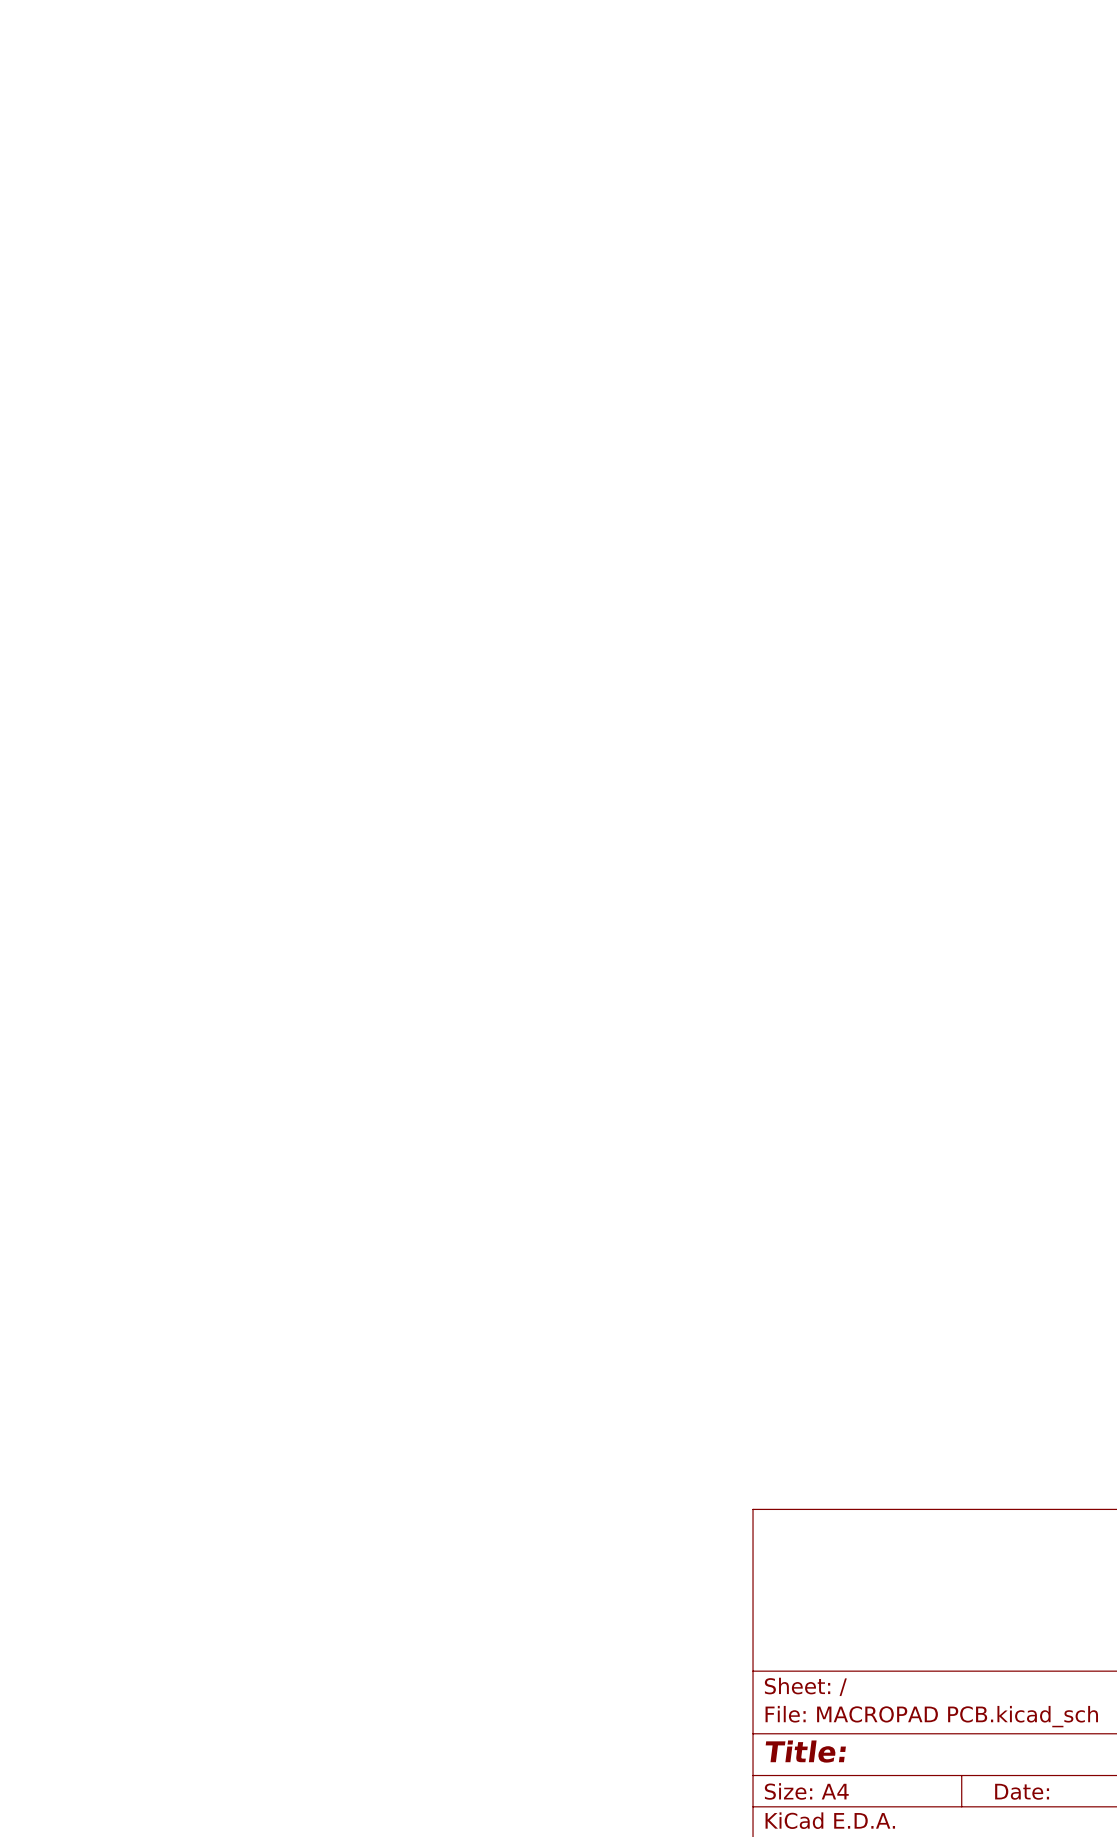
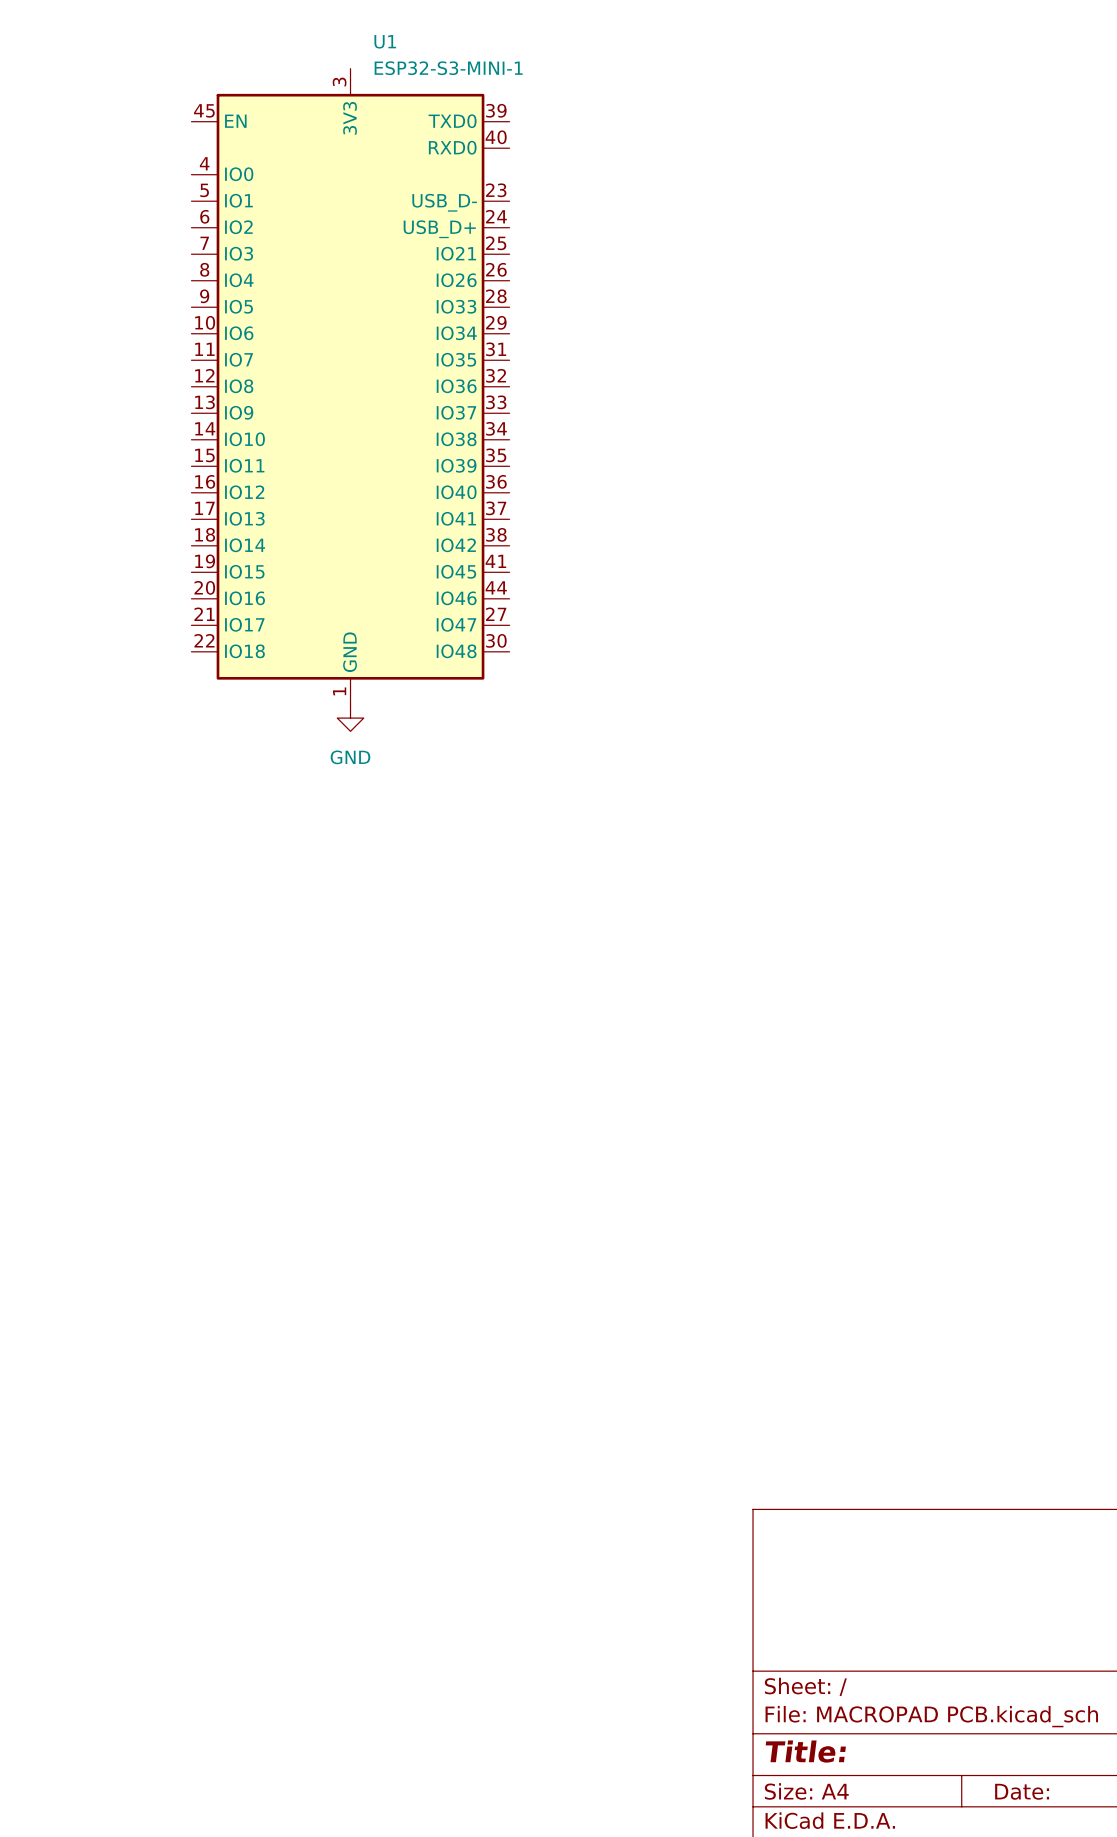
U1: none -> ESP32-S3-MINI-1 (350, 386)
power symbol: none -> GND (350, 718)

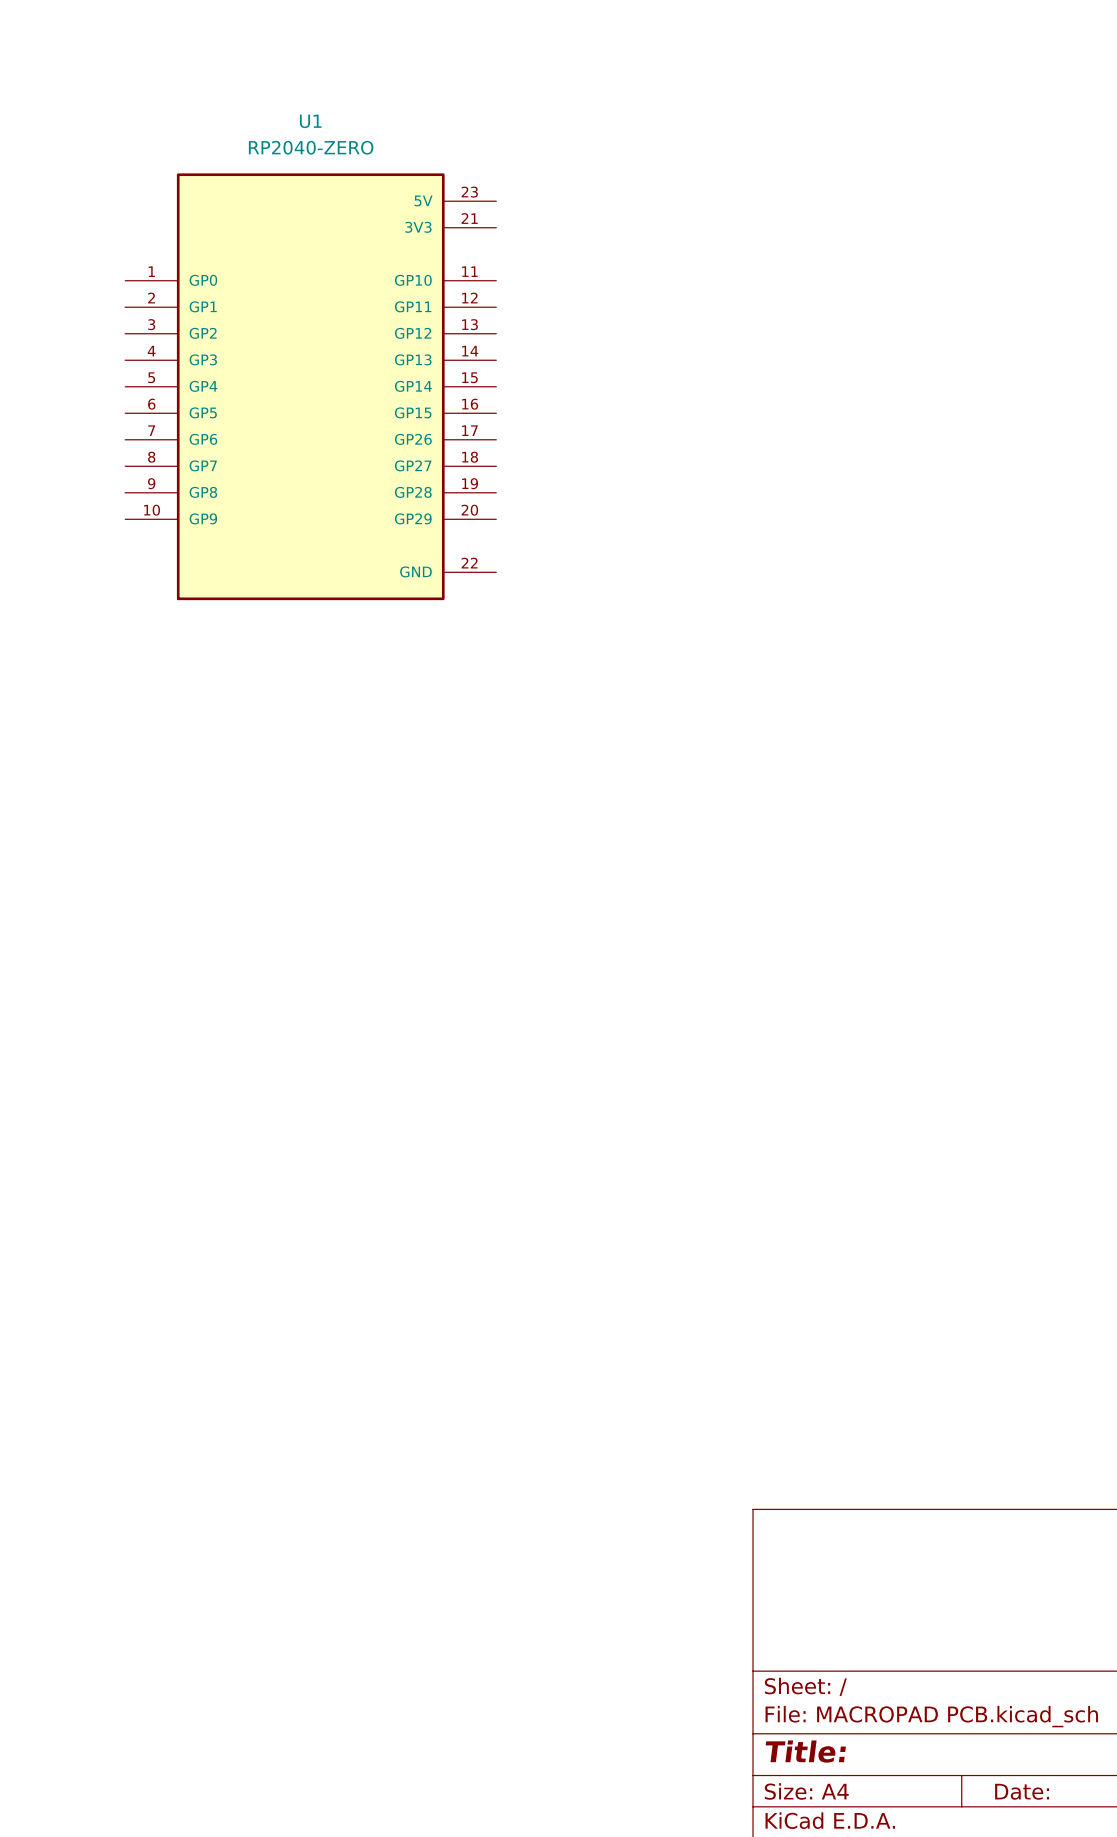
U1 name position: U1 (385, 41) -> U1 (310, 121)
U1 symbol: [191, 68, 510, 705] -> [125, 173, 497, 601]
U1 value: ESP32-S3-MINI-1 (448, 68) -> RP2040-ZERO (311, 147)
power symbol: GND (350, 718) -> none

